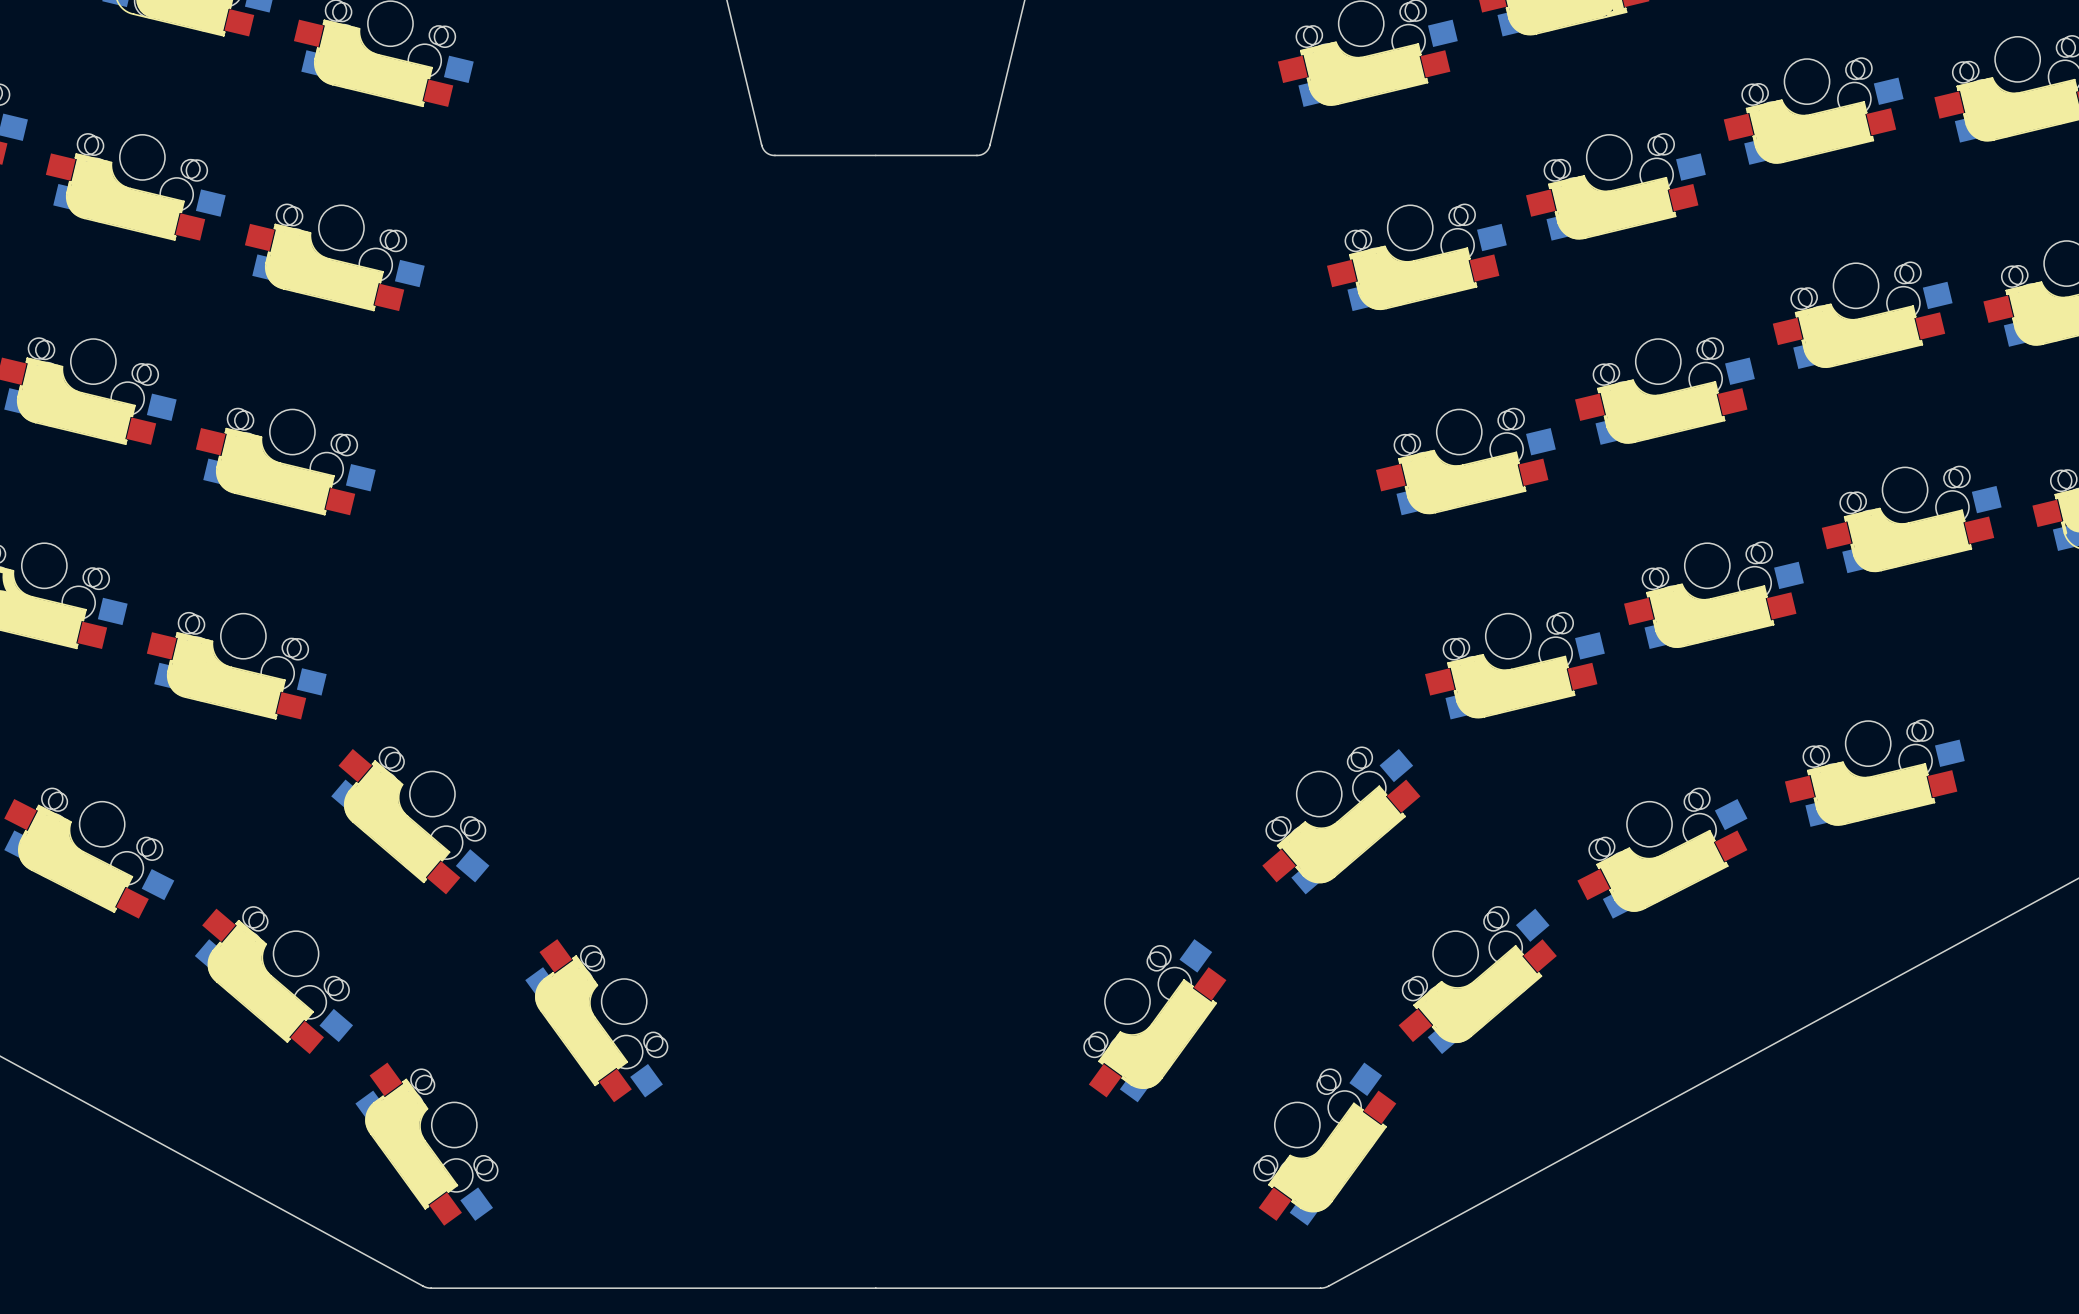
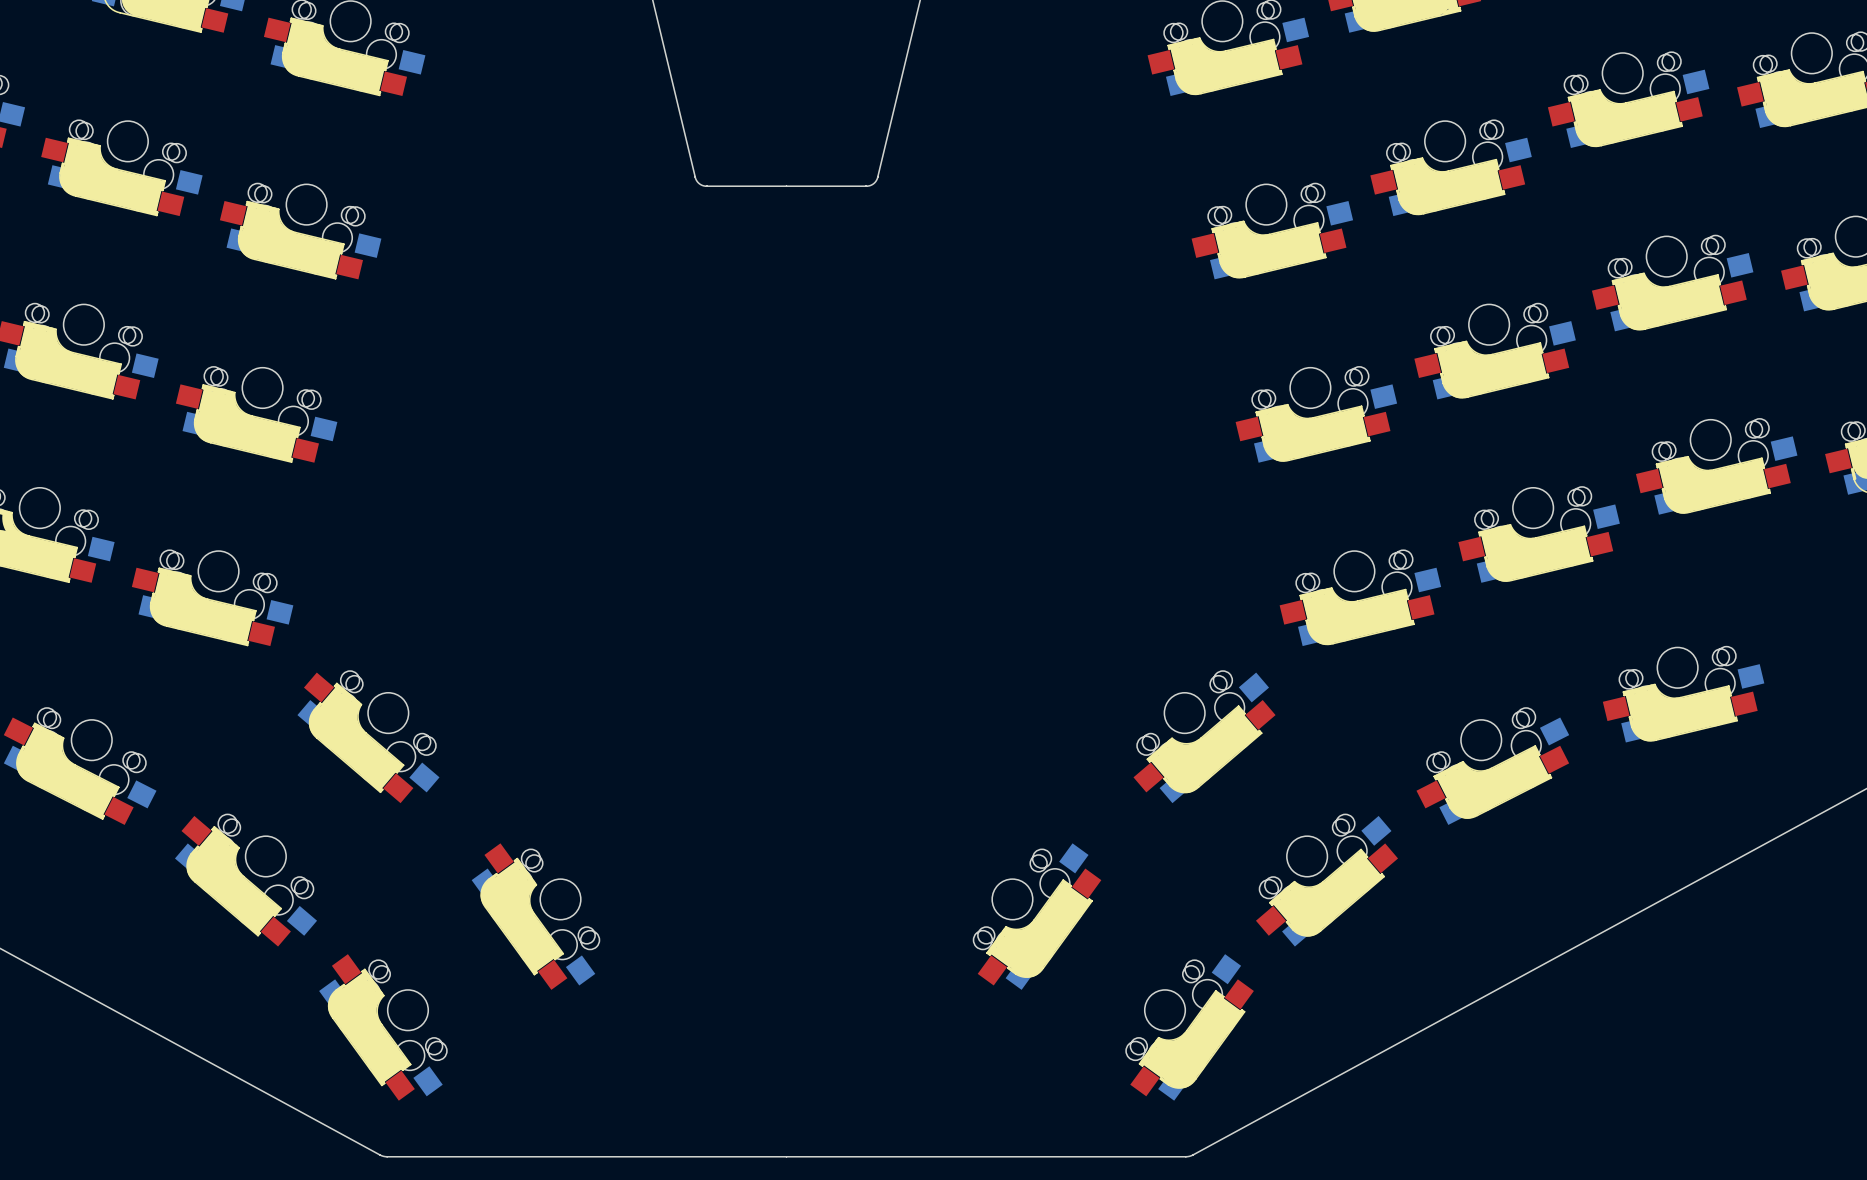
board edge: (761, 144) (766, 152) (774, 155) (977, 155) (985, 152) (990, 144) -> (683, 129) (695, 178) (699, 183) (706, 186) (870, 185) (877, 178) (889, 129)

